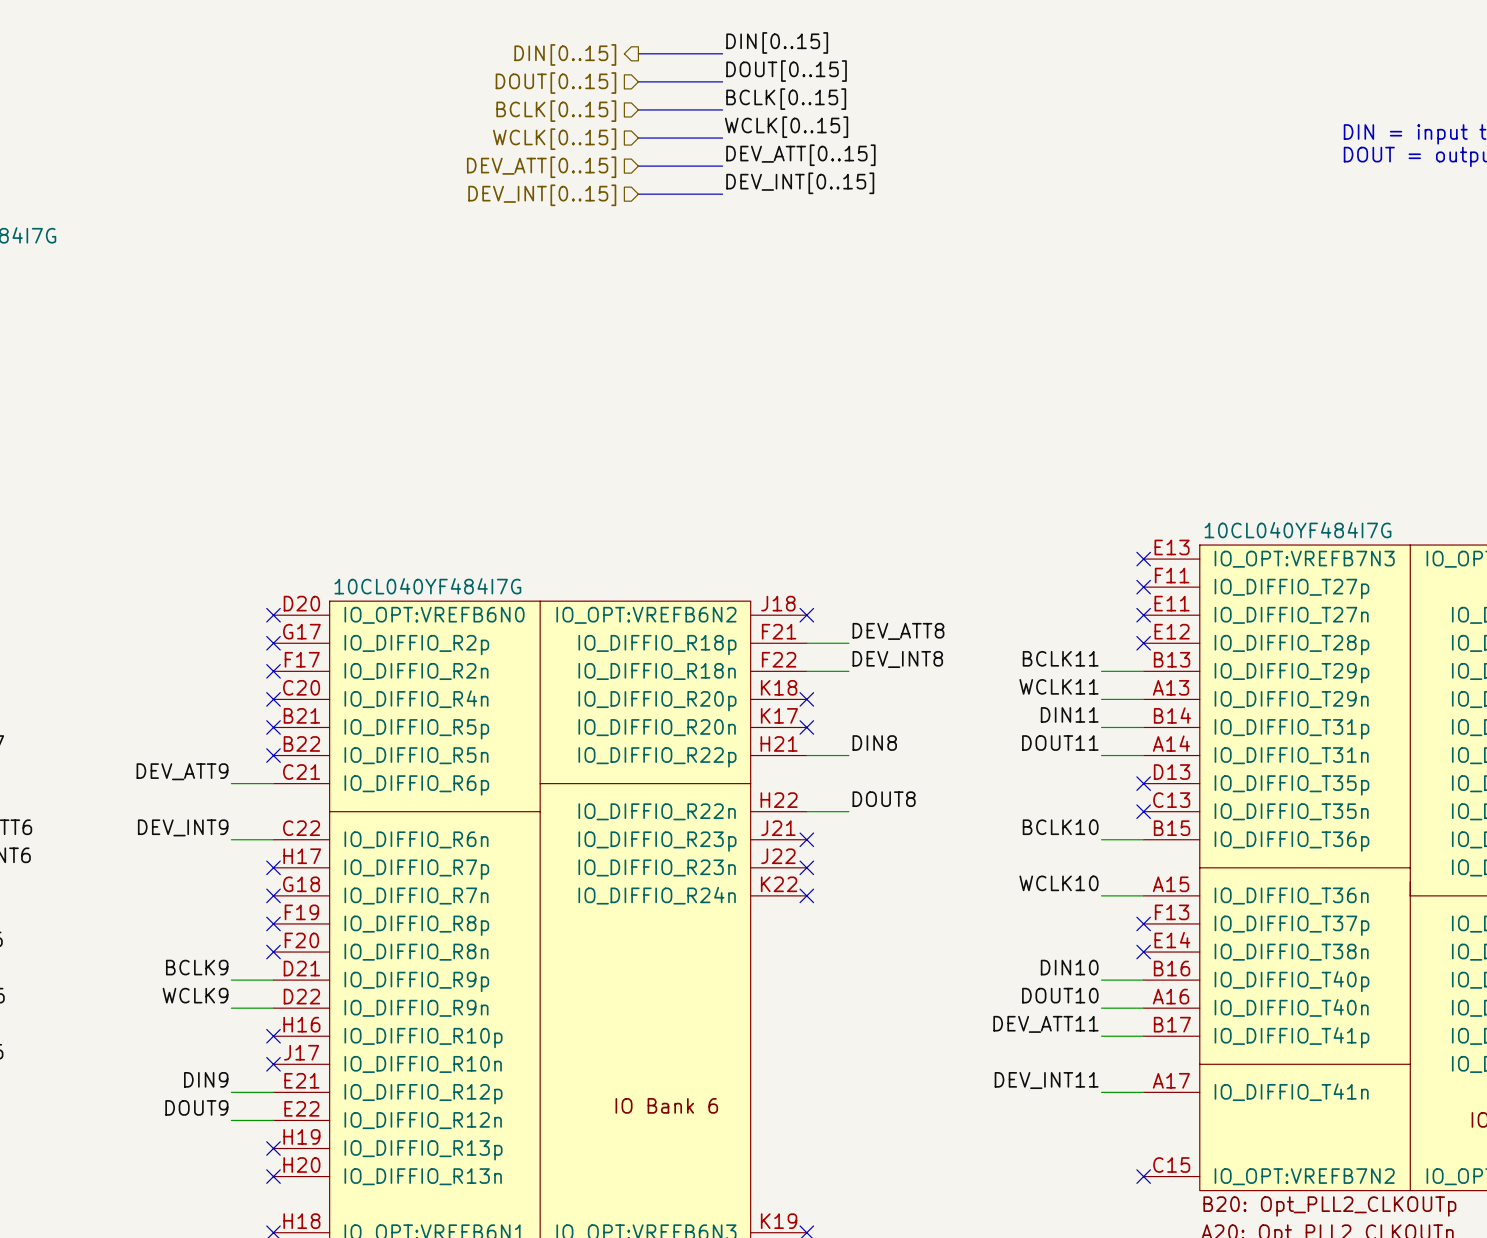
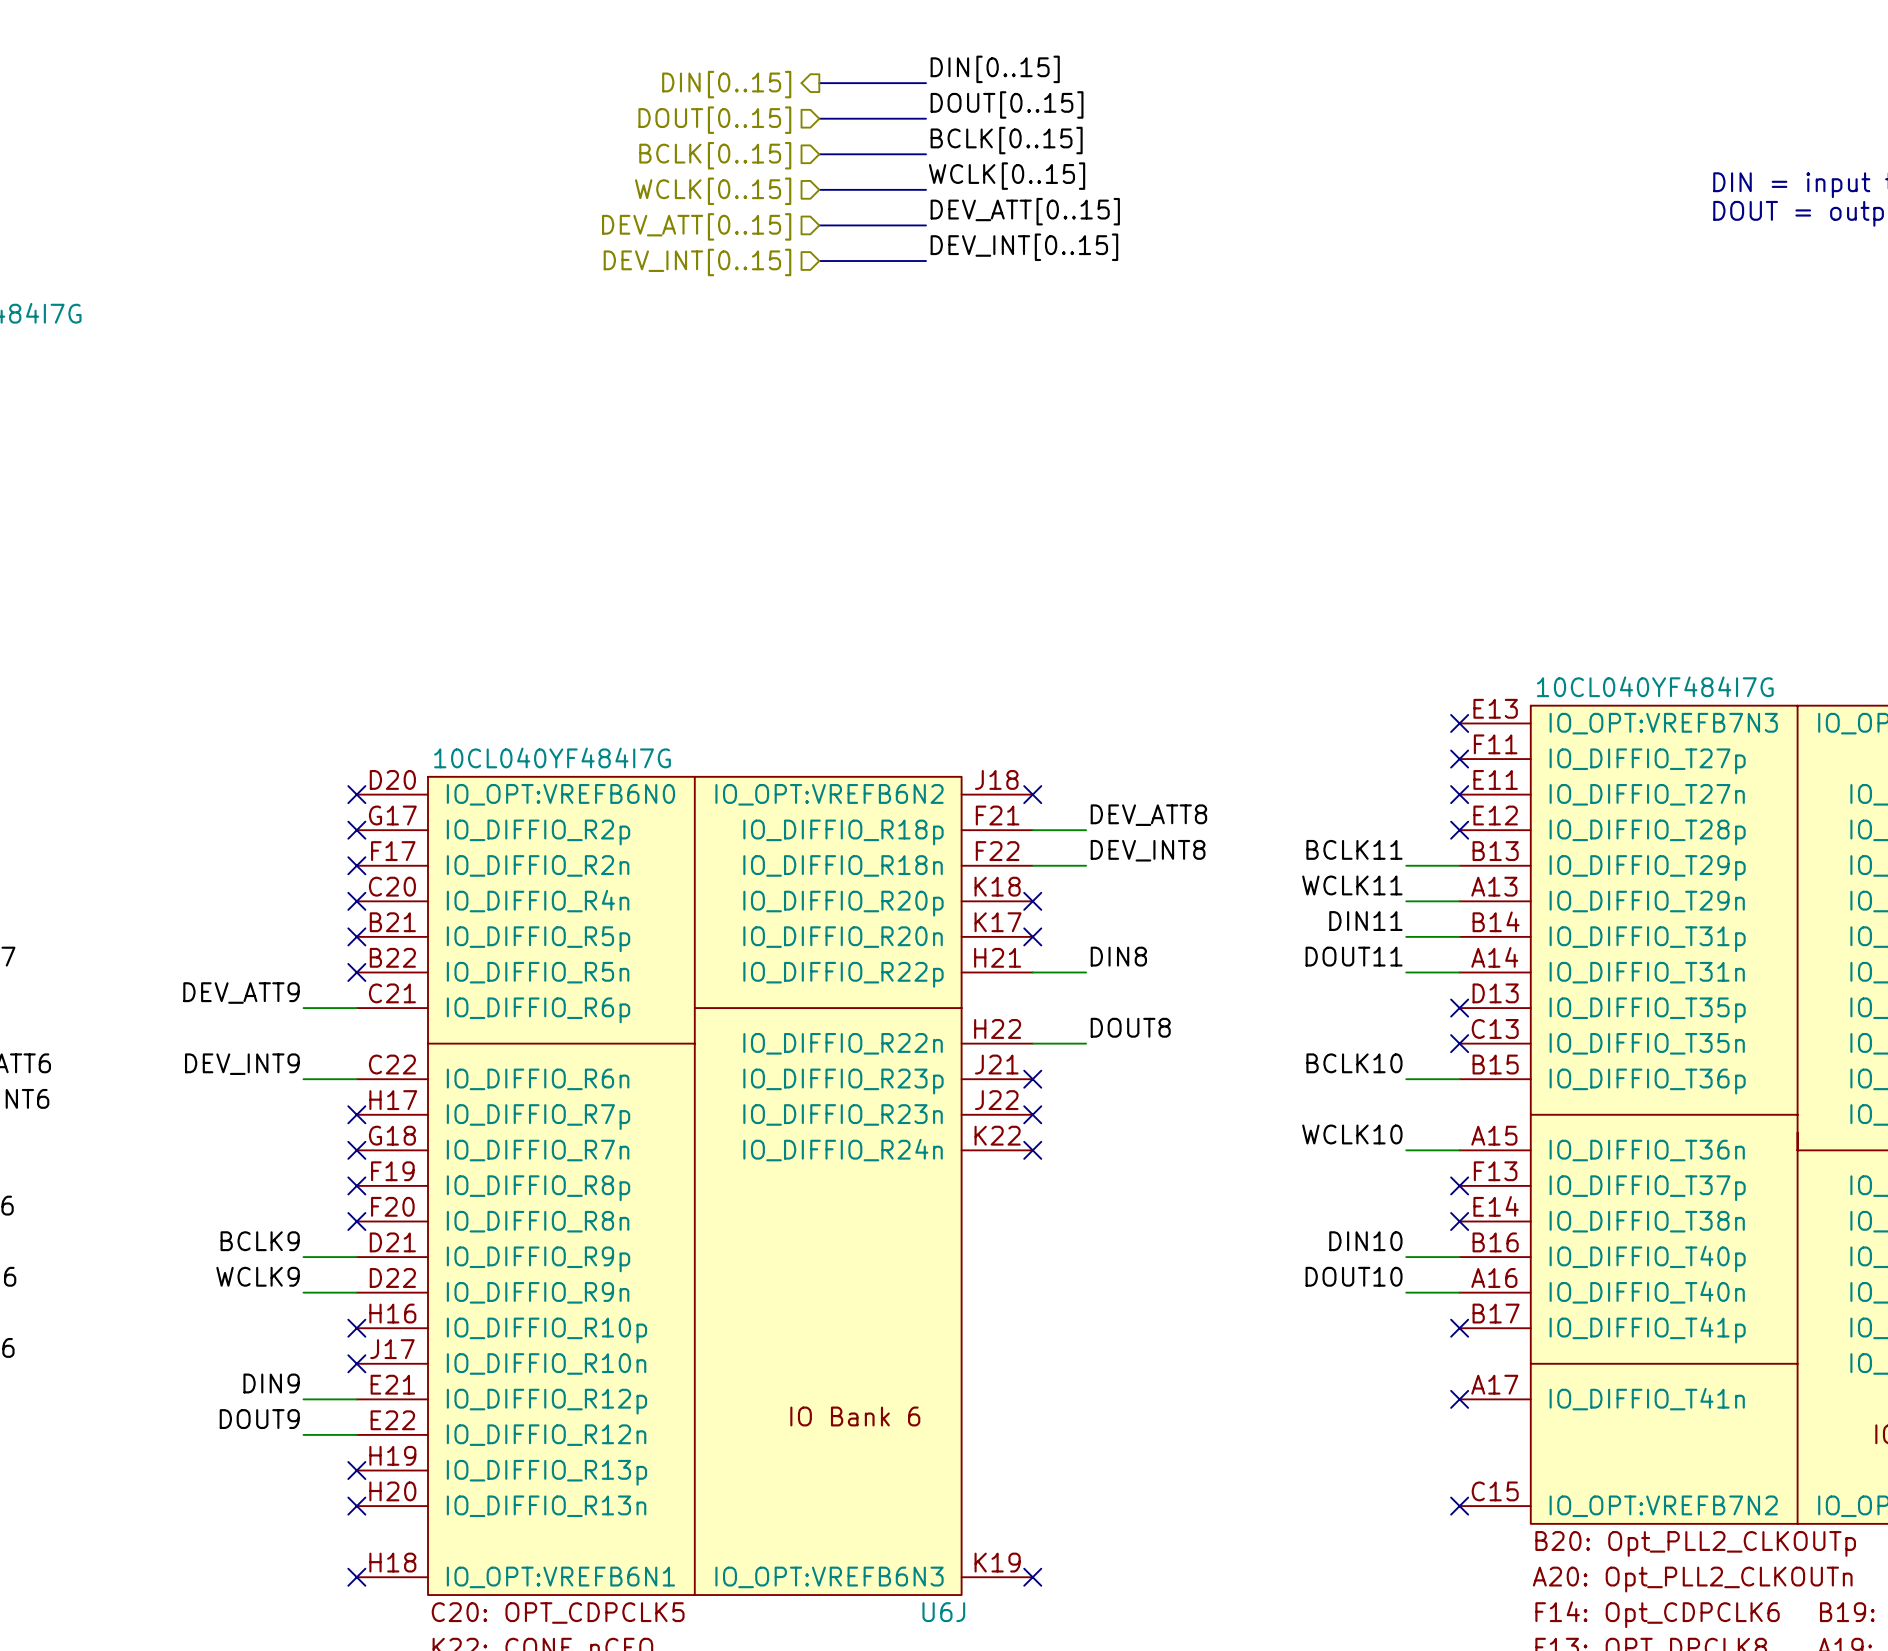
label: DEV_ATT11 (1045, 1024) -> none
wire: (1101, 1036) (1143, 1036) -> none
no-connect mark: none -> (1459, 1328)
label: DEV_INT11 (1046, 1080) -> none
wire: (1101, 1092) (1143, 1092) -> none
no-connect mark: none -> (1459, 1399)

